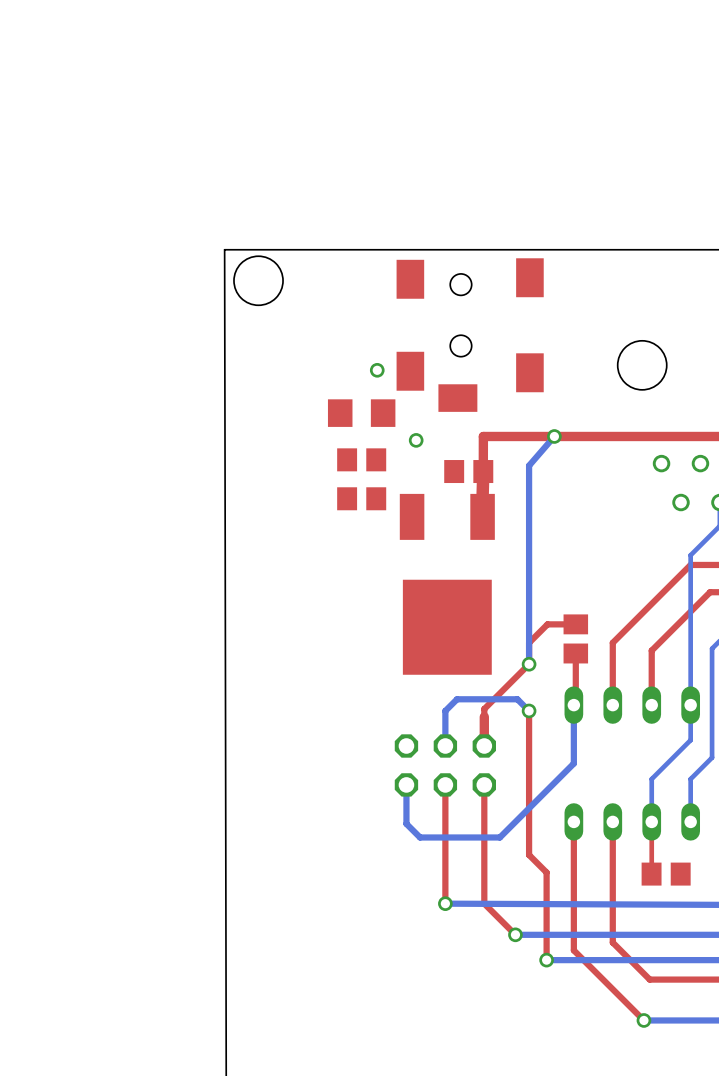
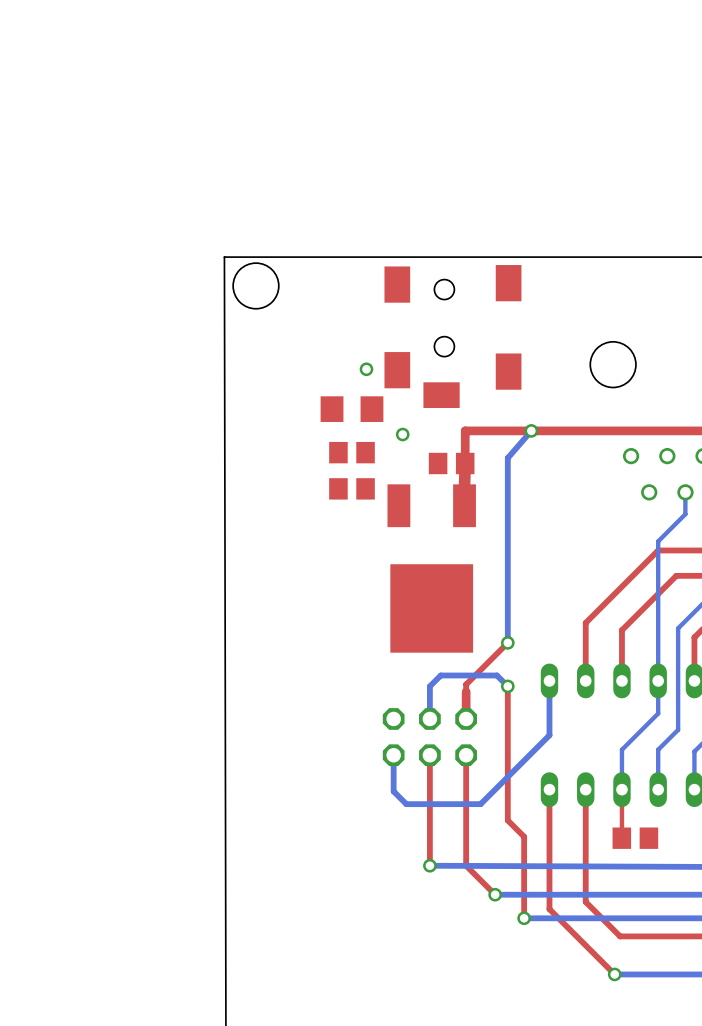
top track: (575, 624) (547, 624) (529, 642) (529, 664) -> none
part: (575, 638) -> none
top track: (575, 653) (575, 705) (573, 705) -> none

